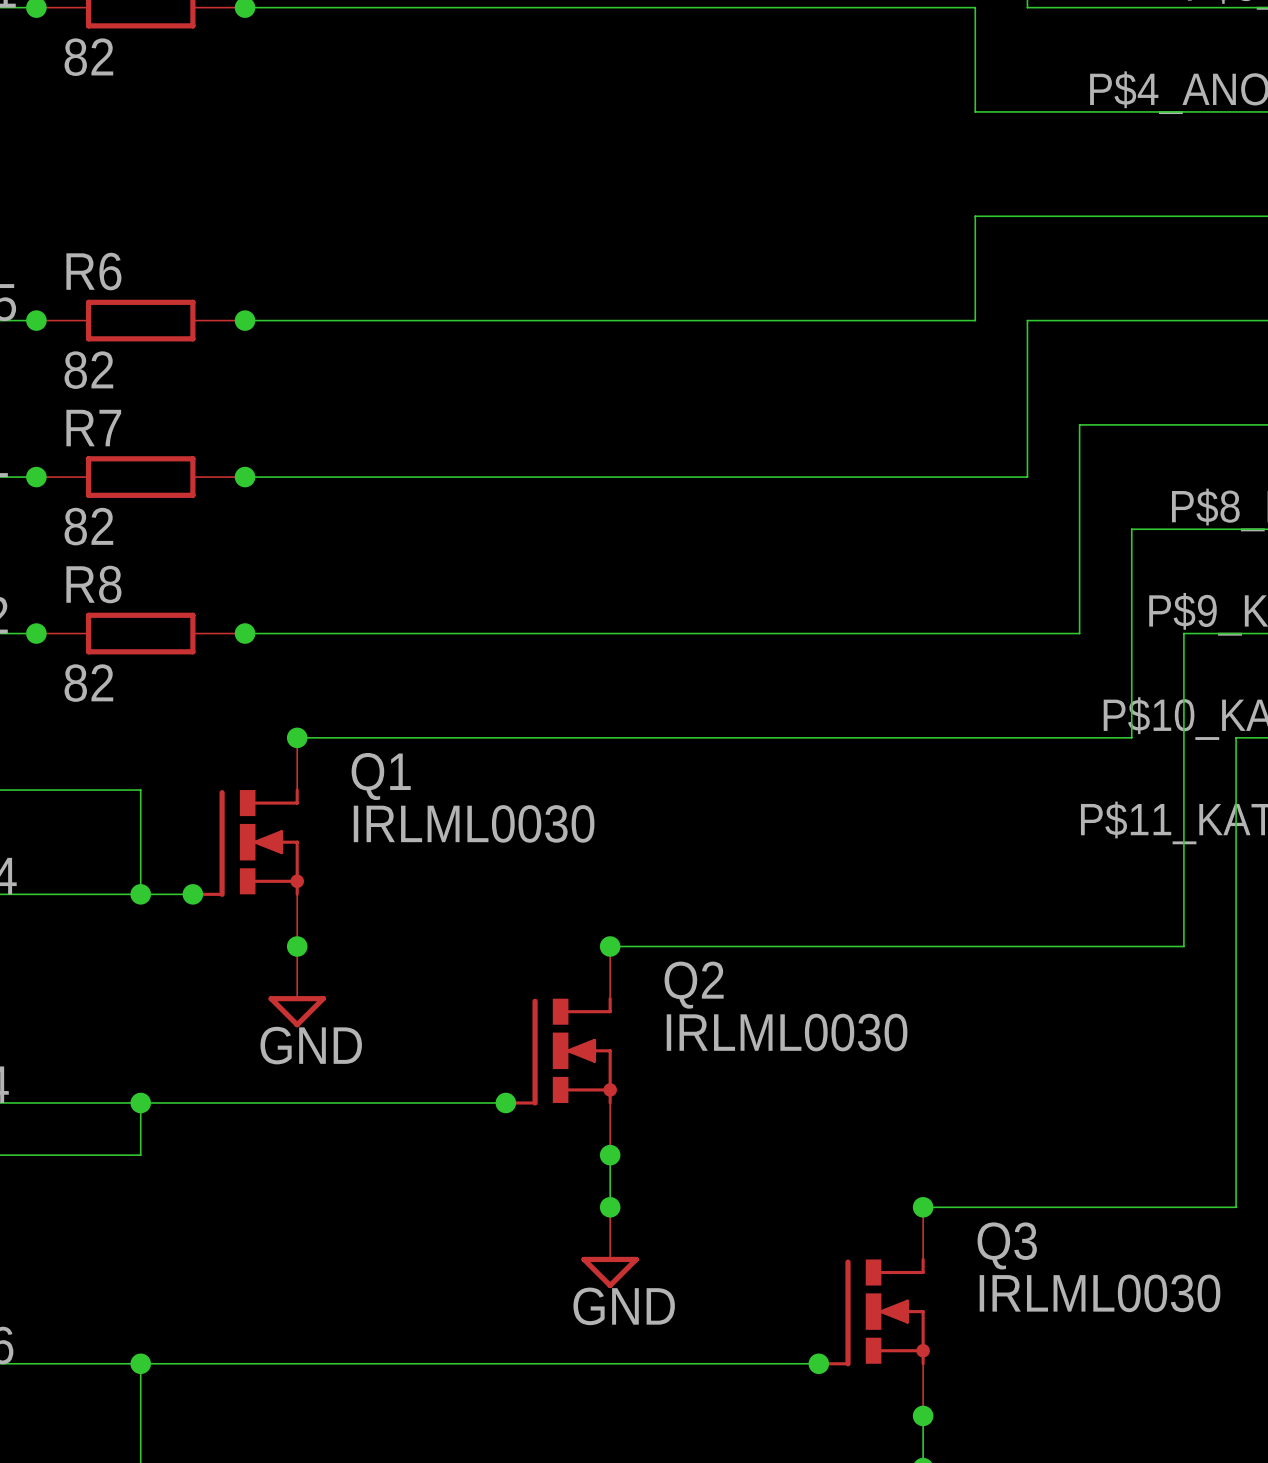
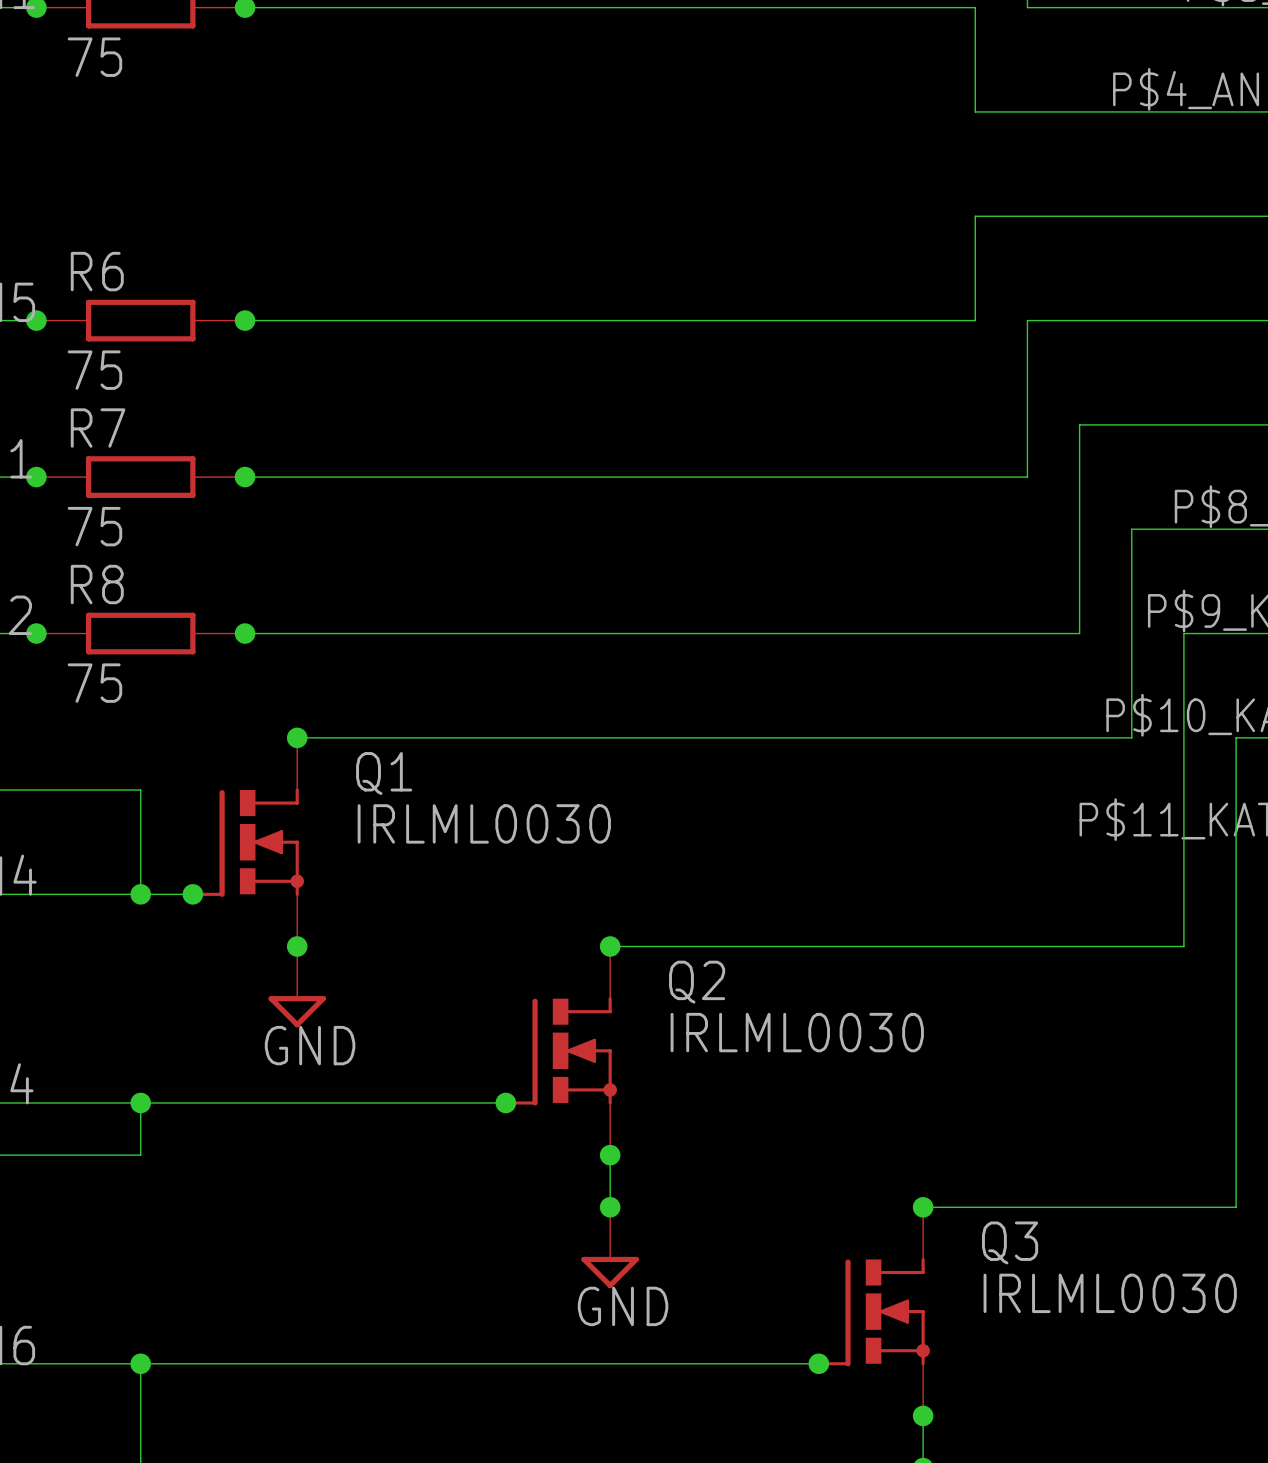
part value: 82 (88, 57) -> 75 (94, 57)
R6 value: 82 (88, 370) -> 75 (94, 370)
R7 value: 82 (88, 526) -> 75 (94, 526)
R8 value: 82 (88, 683) -> 75 (94, 683)

